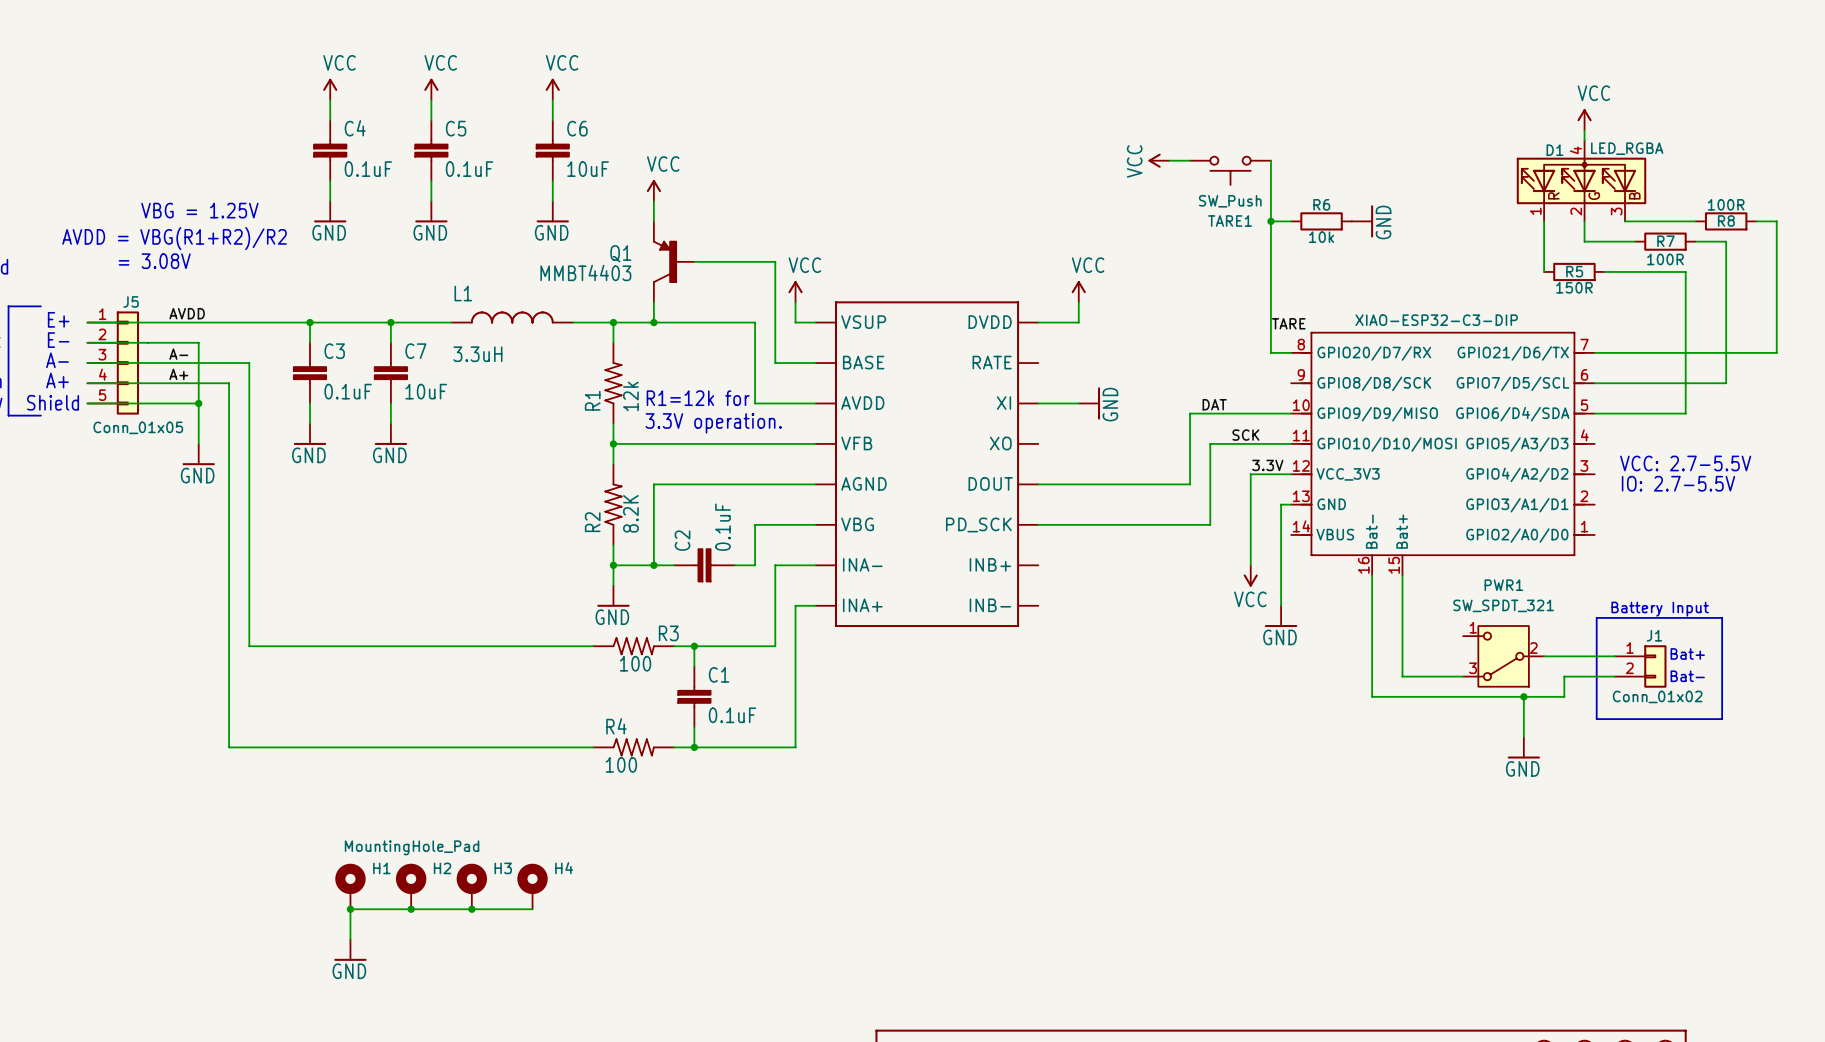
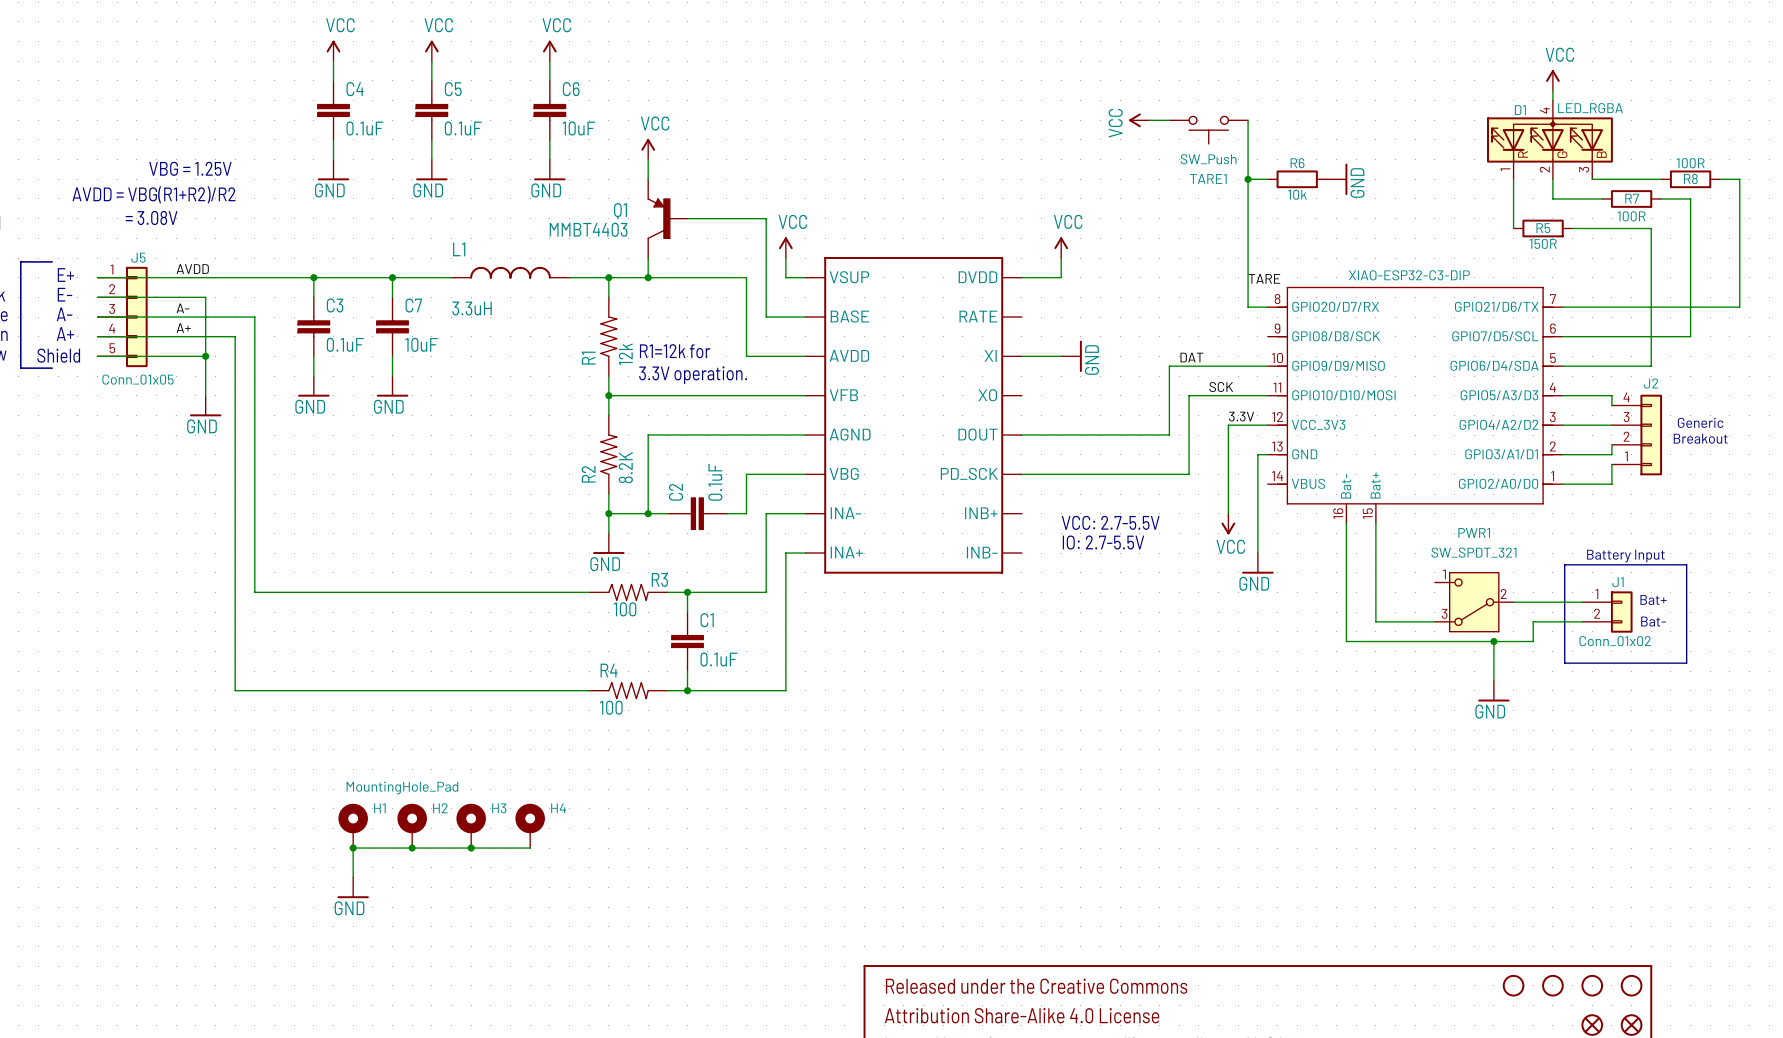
wire: none -> (1562, 395) (1611, 395) (1611, 405)
text: VCC: 2.7-5.5V (1685, 463) -> none
text: none -> Generic (1700, 422)
wire: none -> (1562, 425) (1611, 425)
text: IO: 2.7-5.5V (1678, 483) -> none
J2: none -> (1636, 435)
text: none -> Breakout (1700, 438)
wire: none -> (1611, 444) (1611, 454) (1562, 454)
wire: none -> (1611, 464) (1611, 484) (1562, 484)
text: none -> VCC: 2.7-5.5V (1110, 522)
text: none -> IO: 2.7-5.5V (1103, 542)

